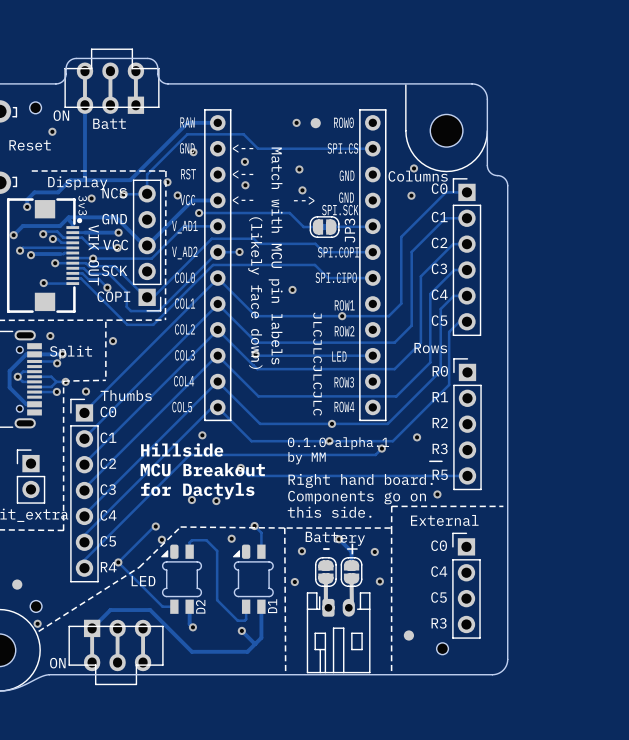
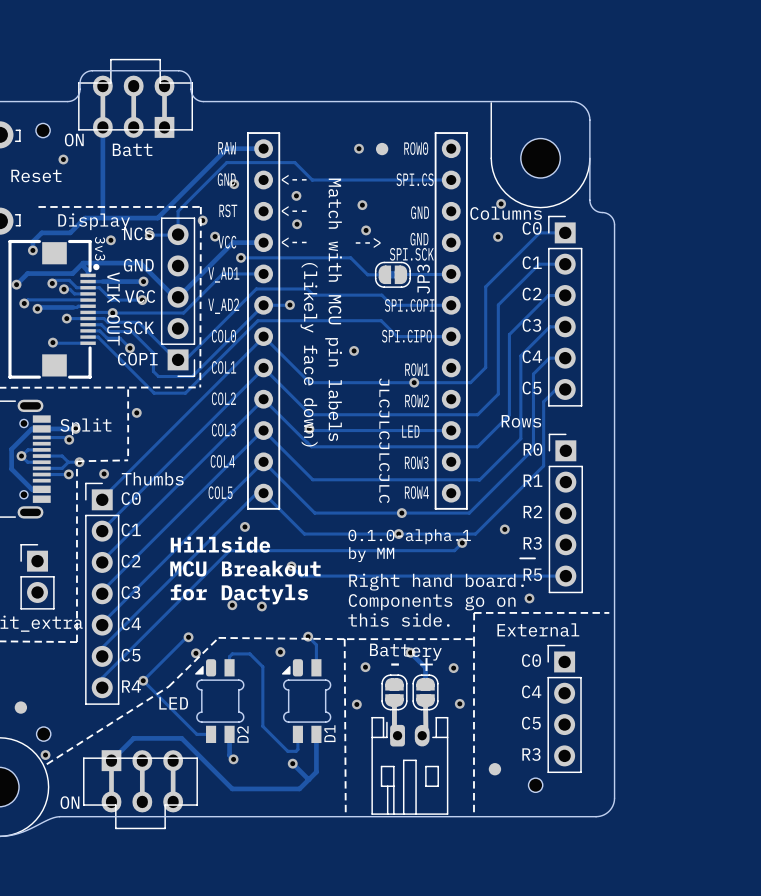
via: (50, 336) -> none

